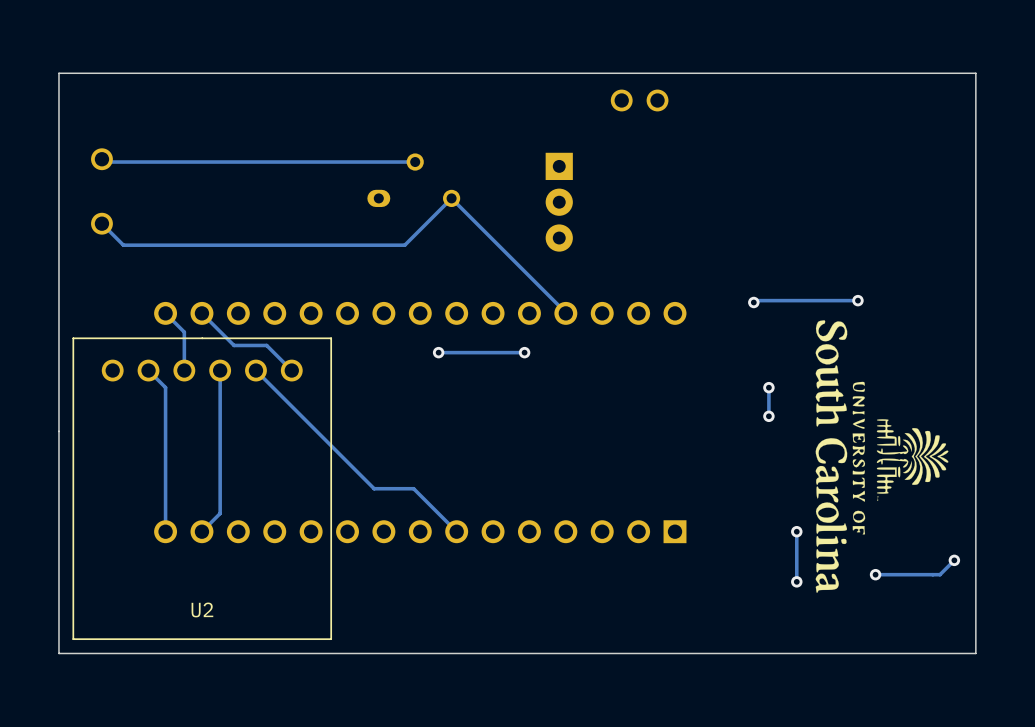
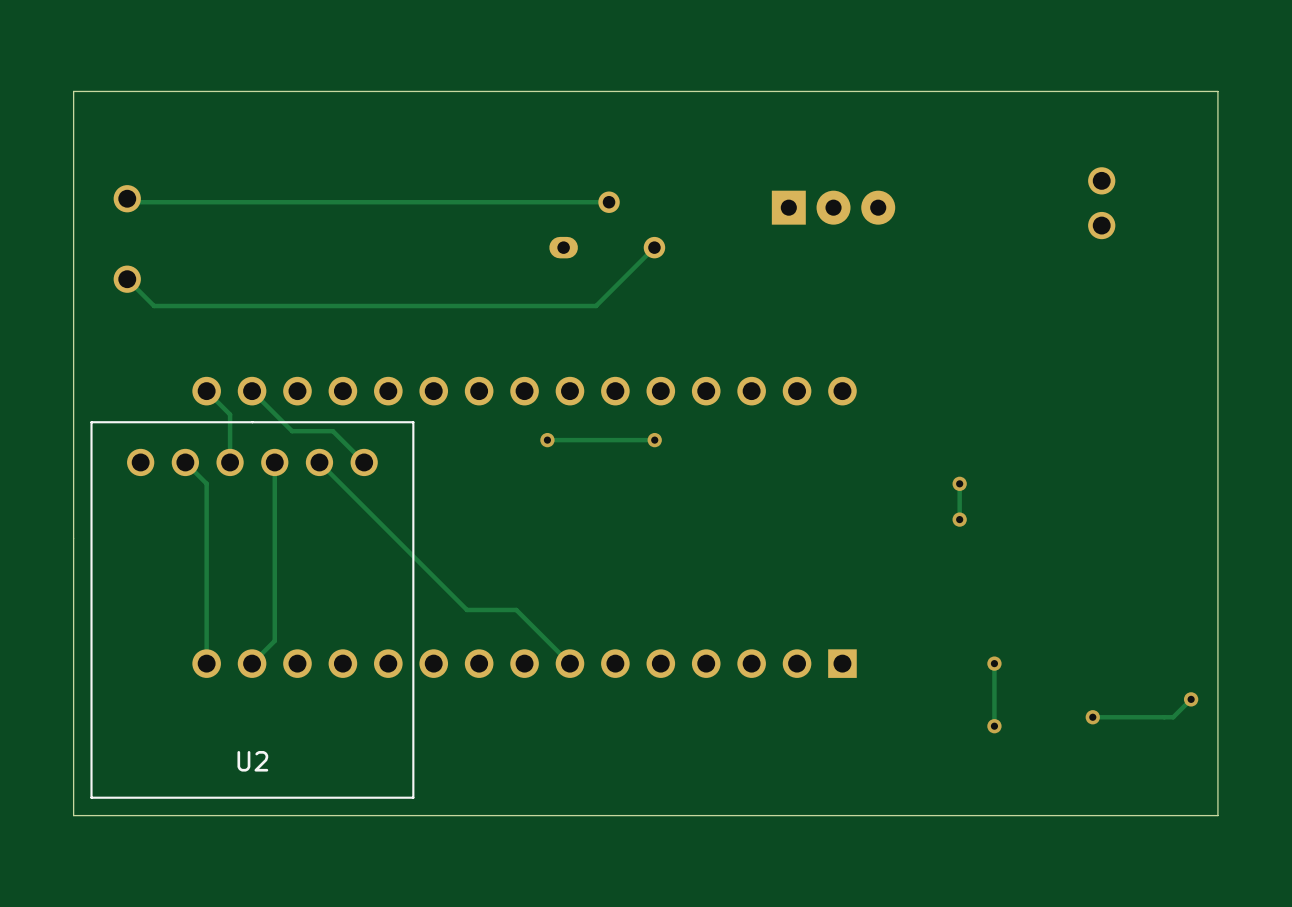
part rotation: 0° (639, 100) -> 90° clockwise (1101, 203)
part position: (639, 100) -> (1101, 203)
track: none -> (609, 202) (518, 202)
part position: (413, 180) -> (607, 224)
track: (451, 198) (404, 245) -> (654, 247) (596, 306) (505, 306)
track: (451, 198) (565, 313) -> none
part rotation: 0° (559, 202) -> 90° counterclockwise (833, 207)
part position: (559, 202) -> (833, 207)
track: (857, 300) (755, 300) (753, 302) -> none
via: (857, 300) -> none
via: (753, 302) -> none
drawing: [815, 320, 949, 593] -> none

